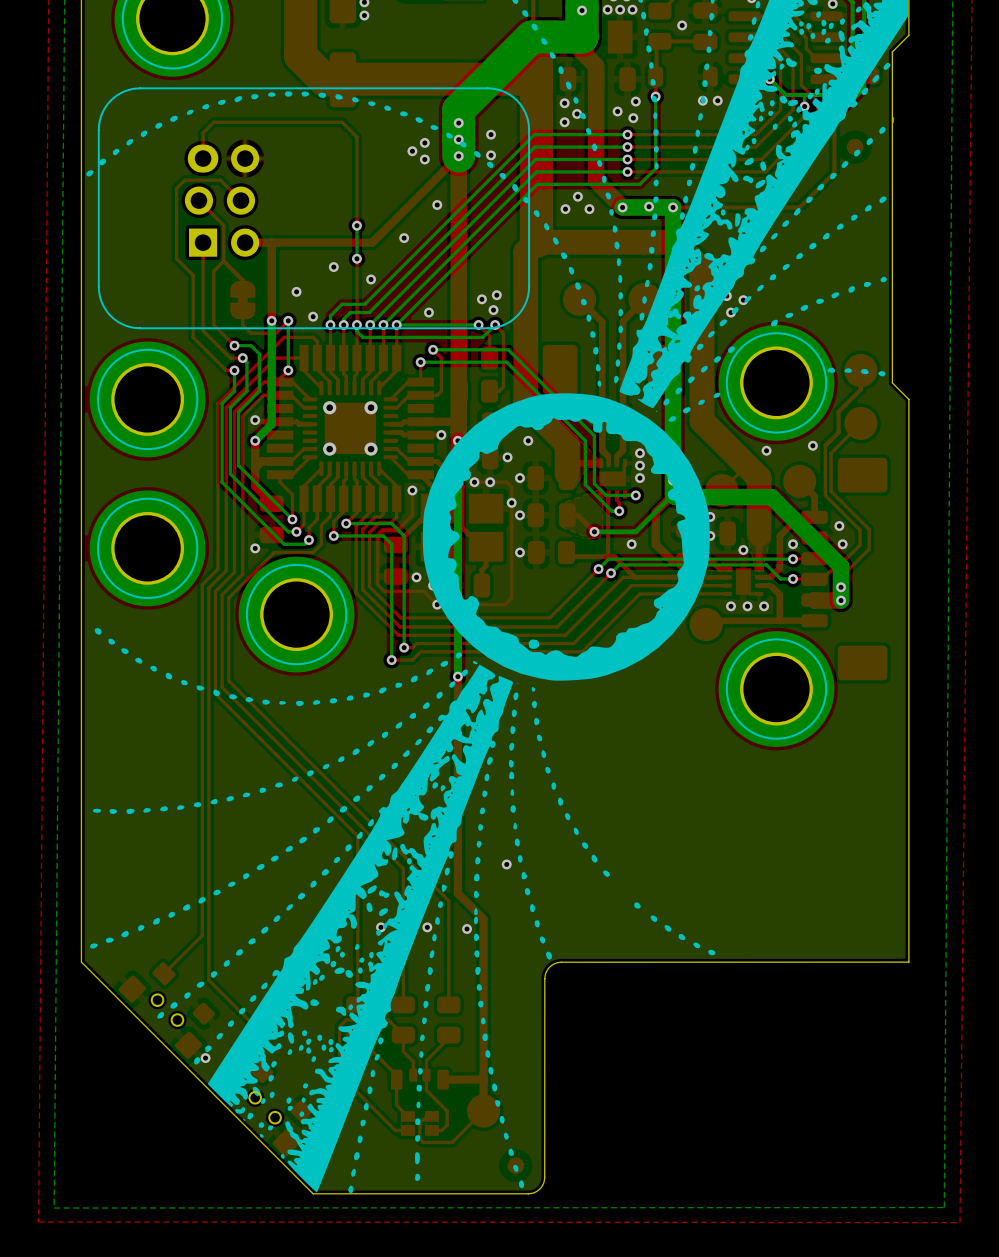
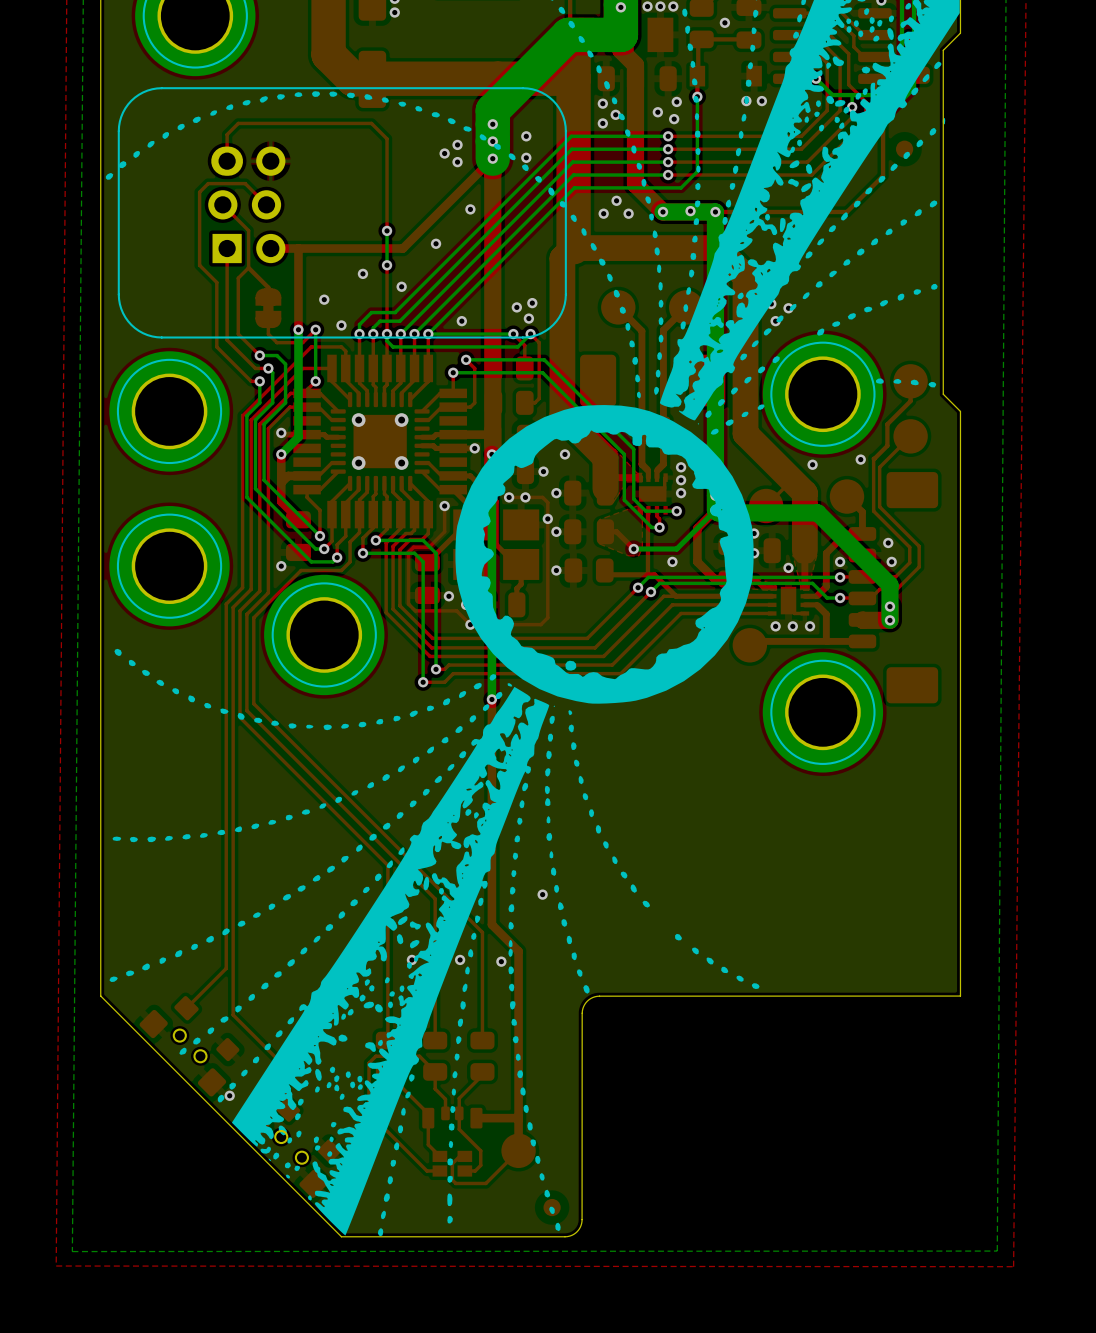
part footprint: [648, 66, 718, 87] -> [689, 65, 762, 87]

